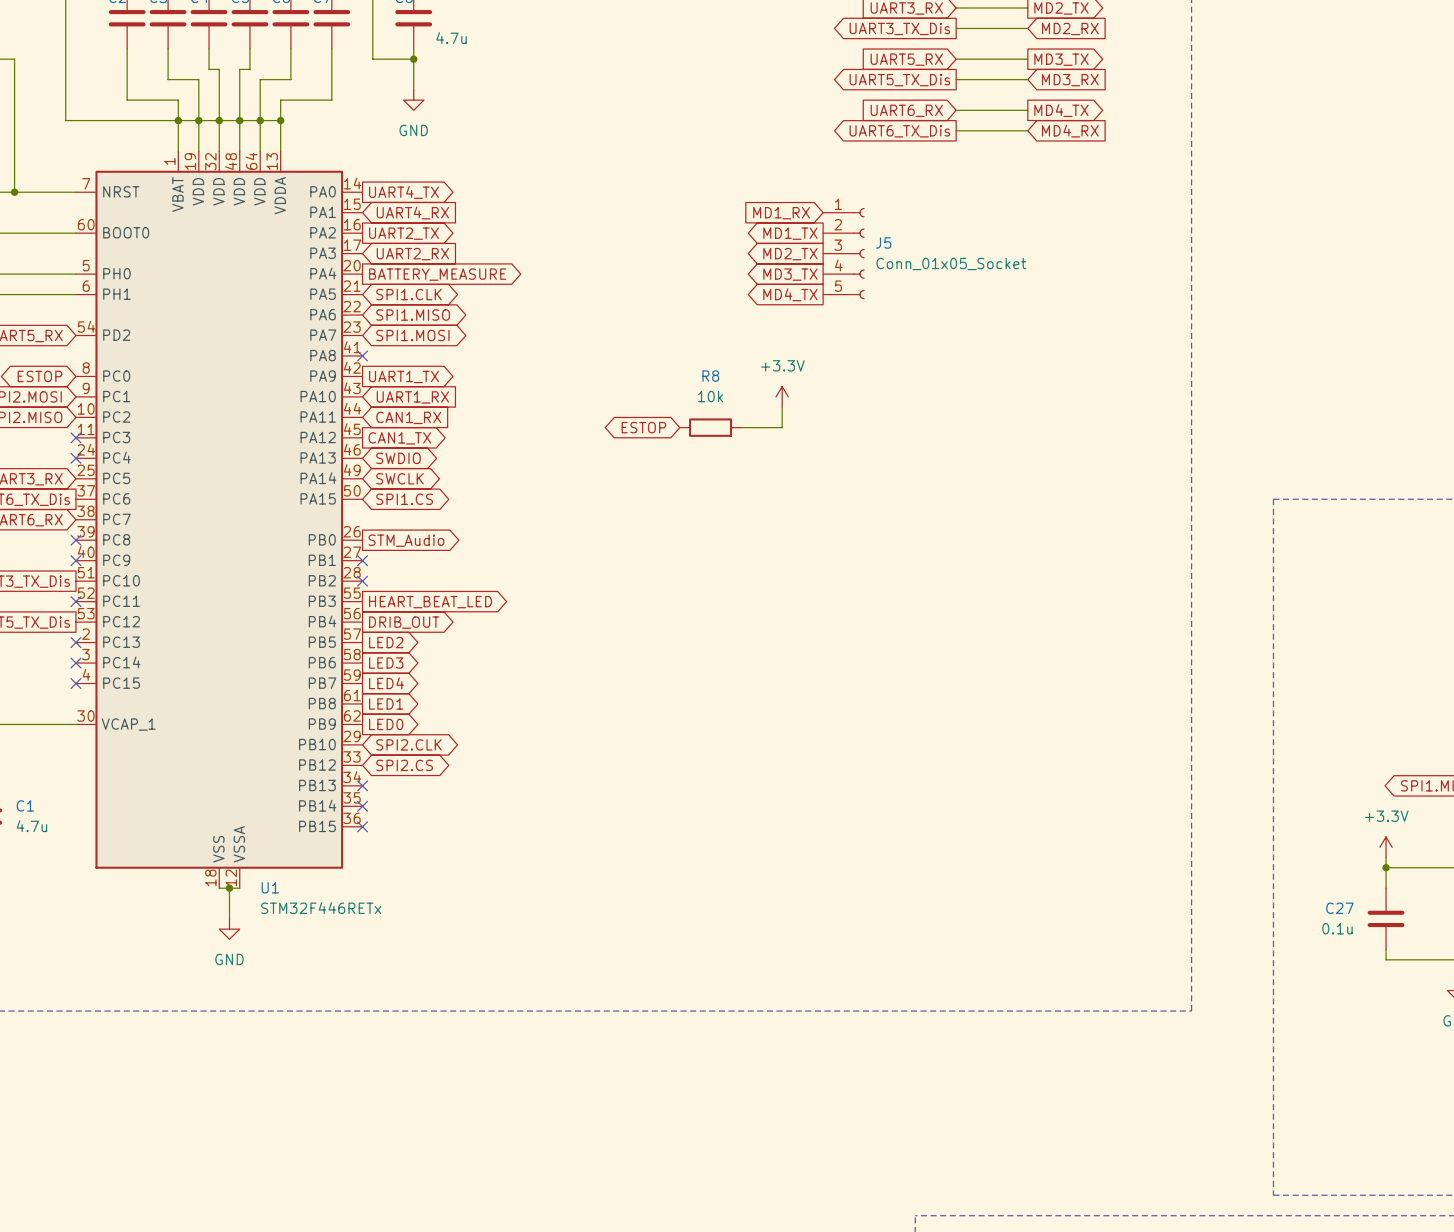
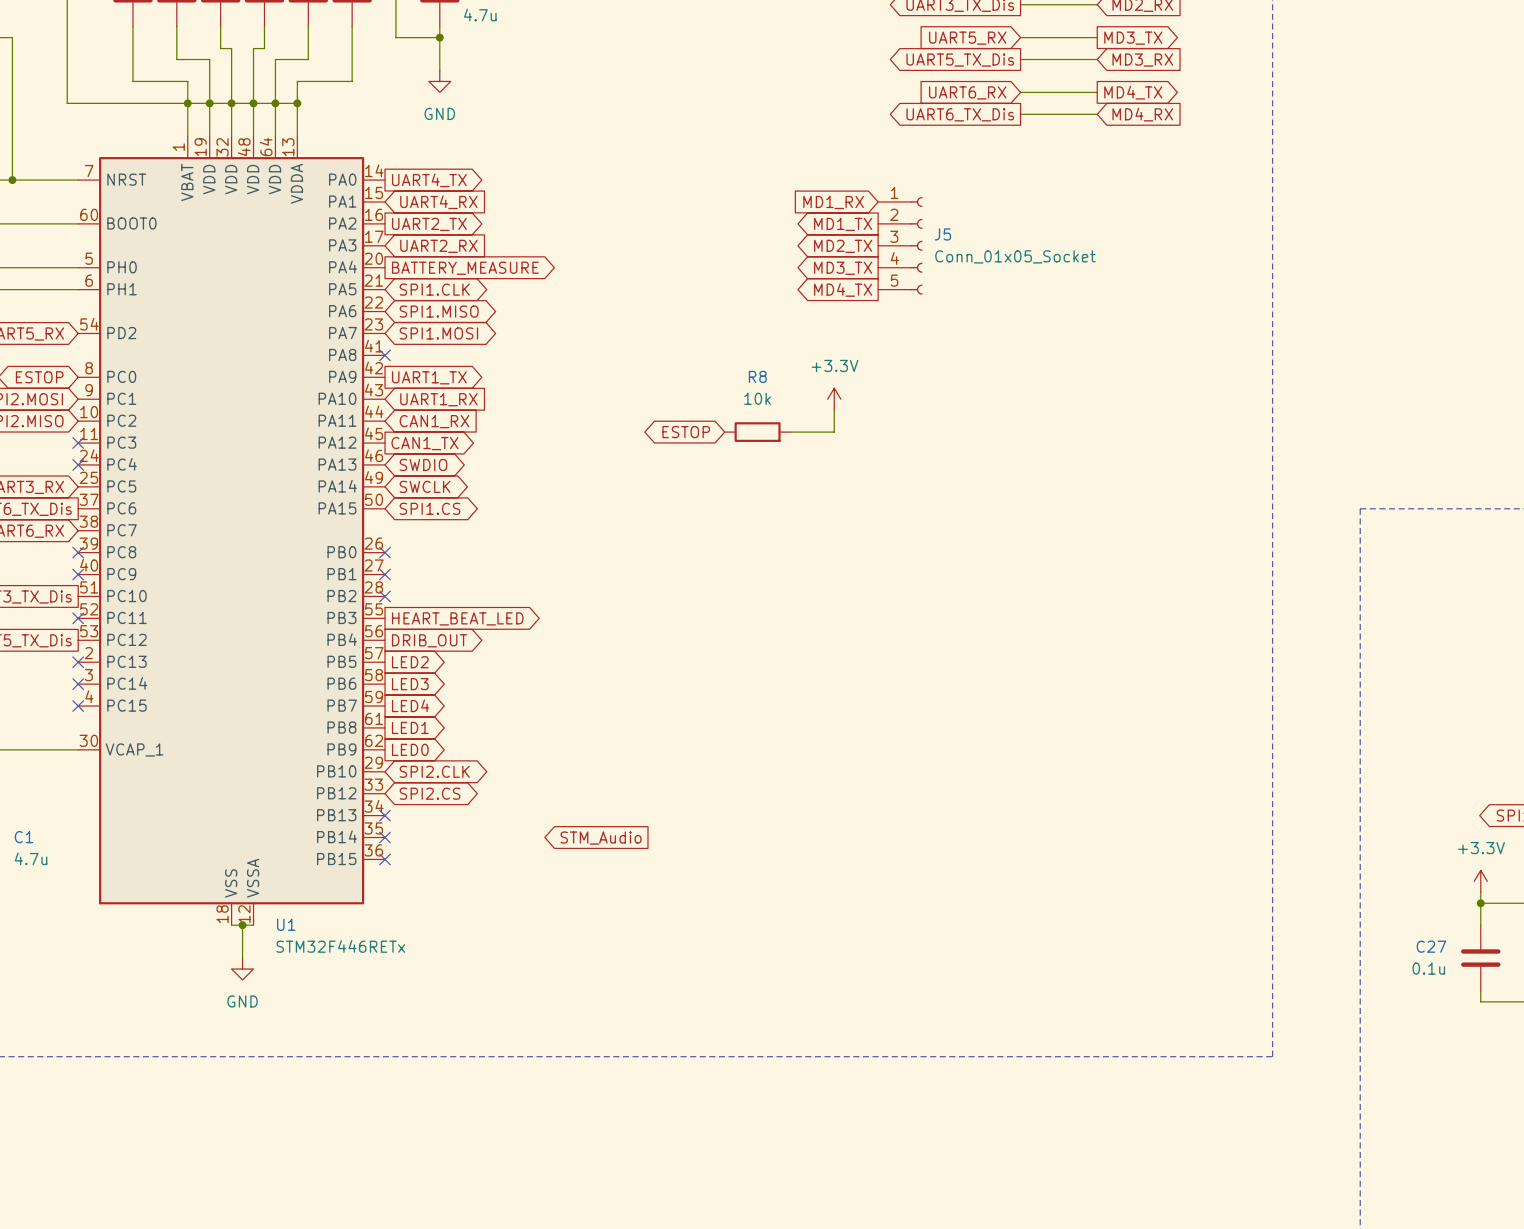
no-connect mark: none -> (385, 552)
global label: STM_Audio (406, 540) -> none
global label: none -> STM_Audio (601, 838)

